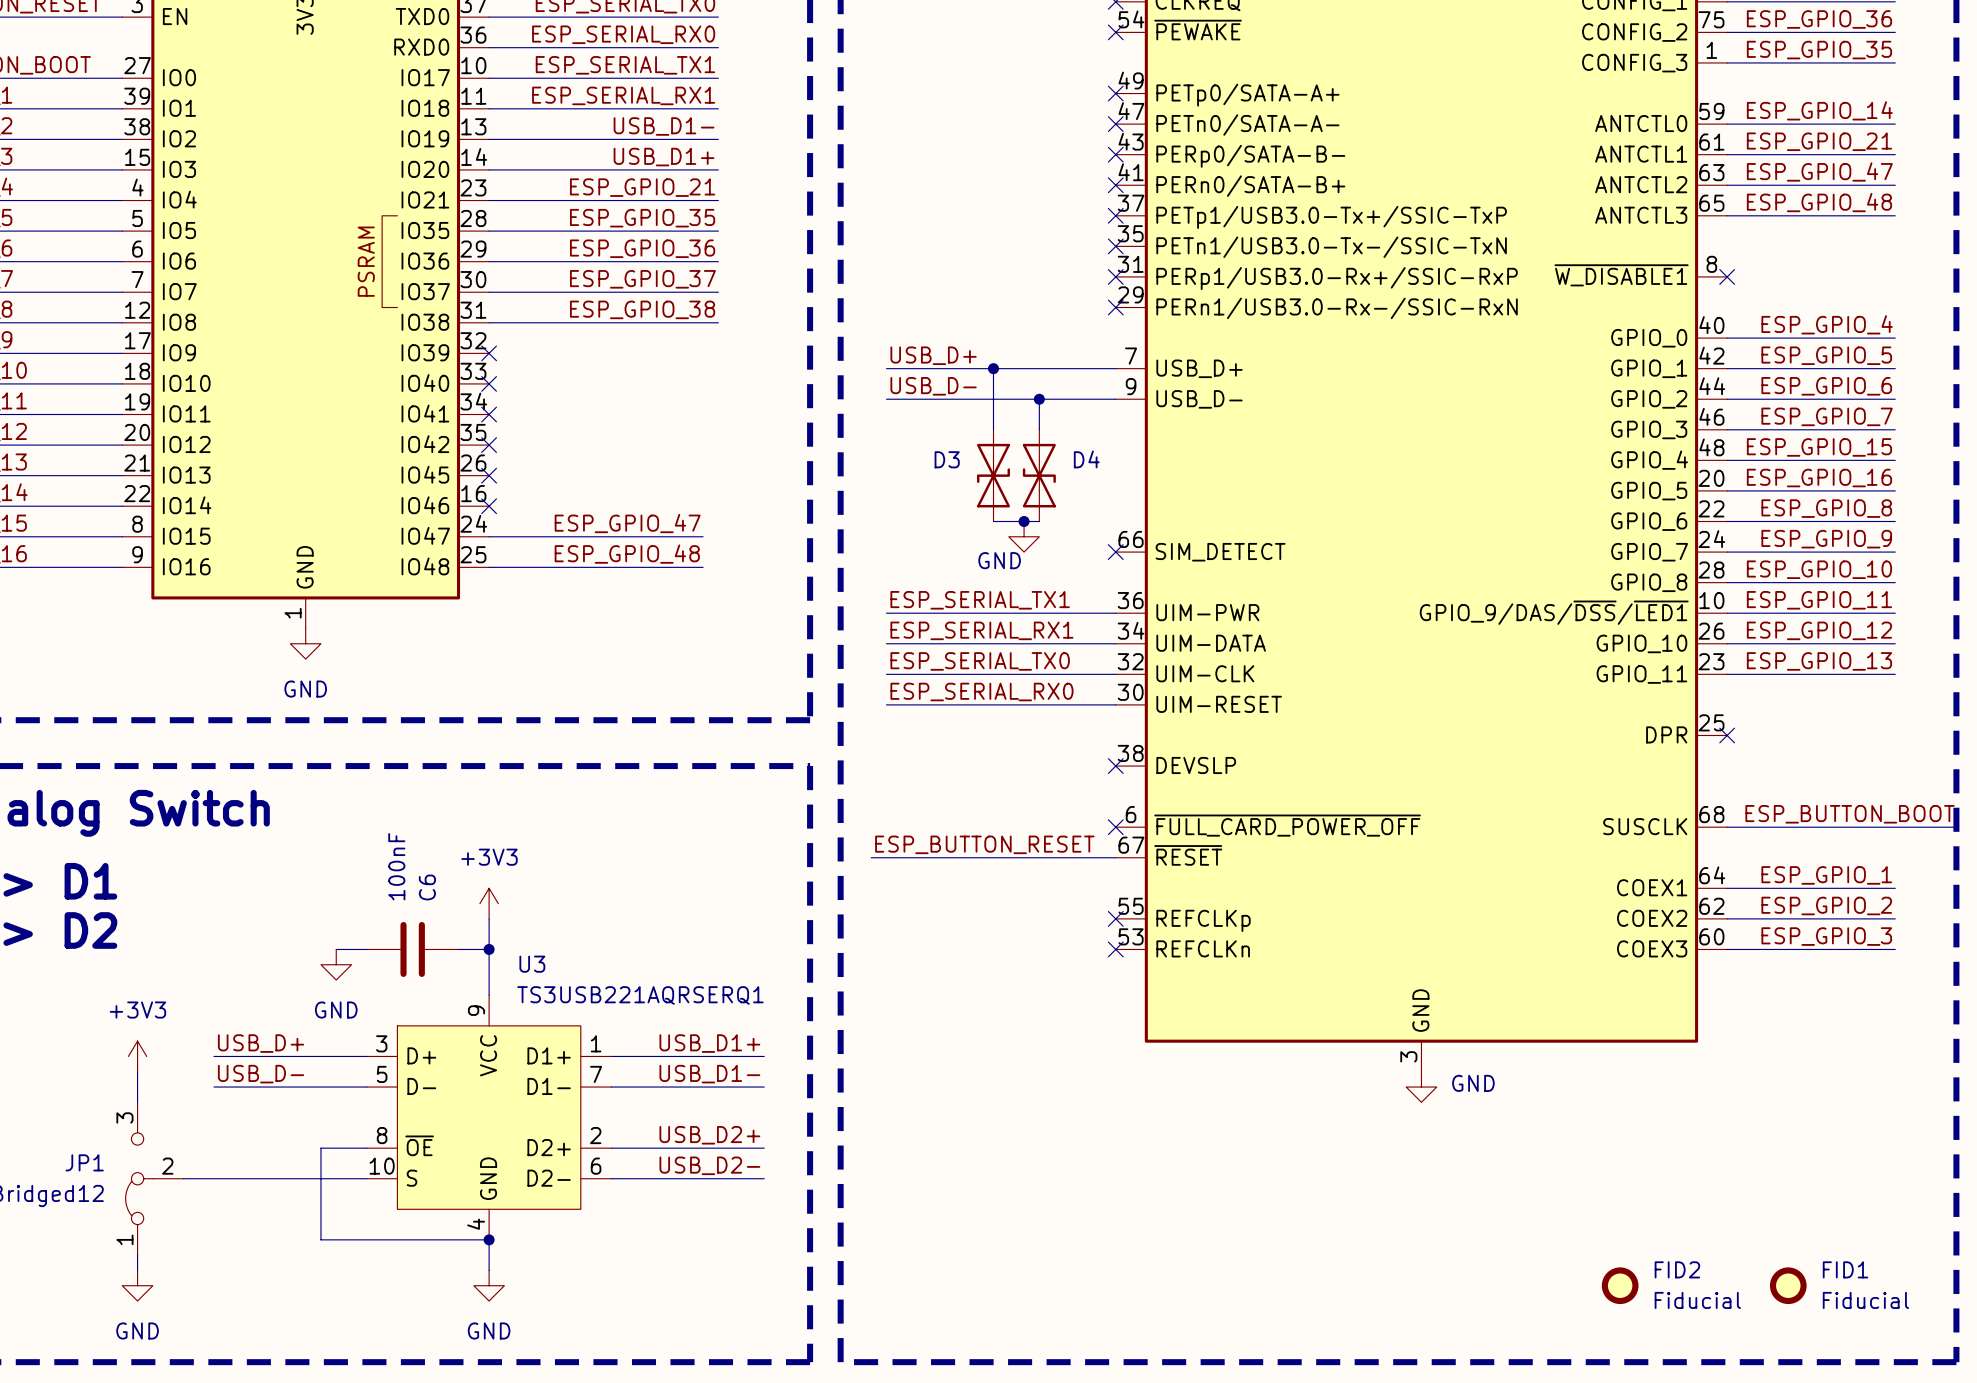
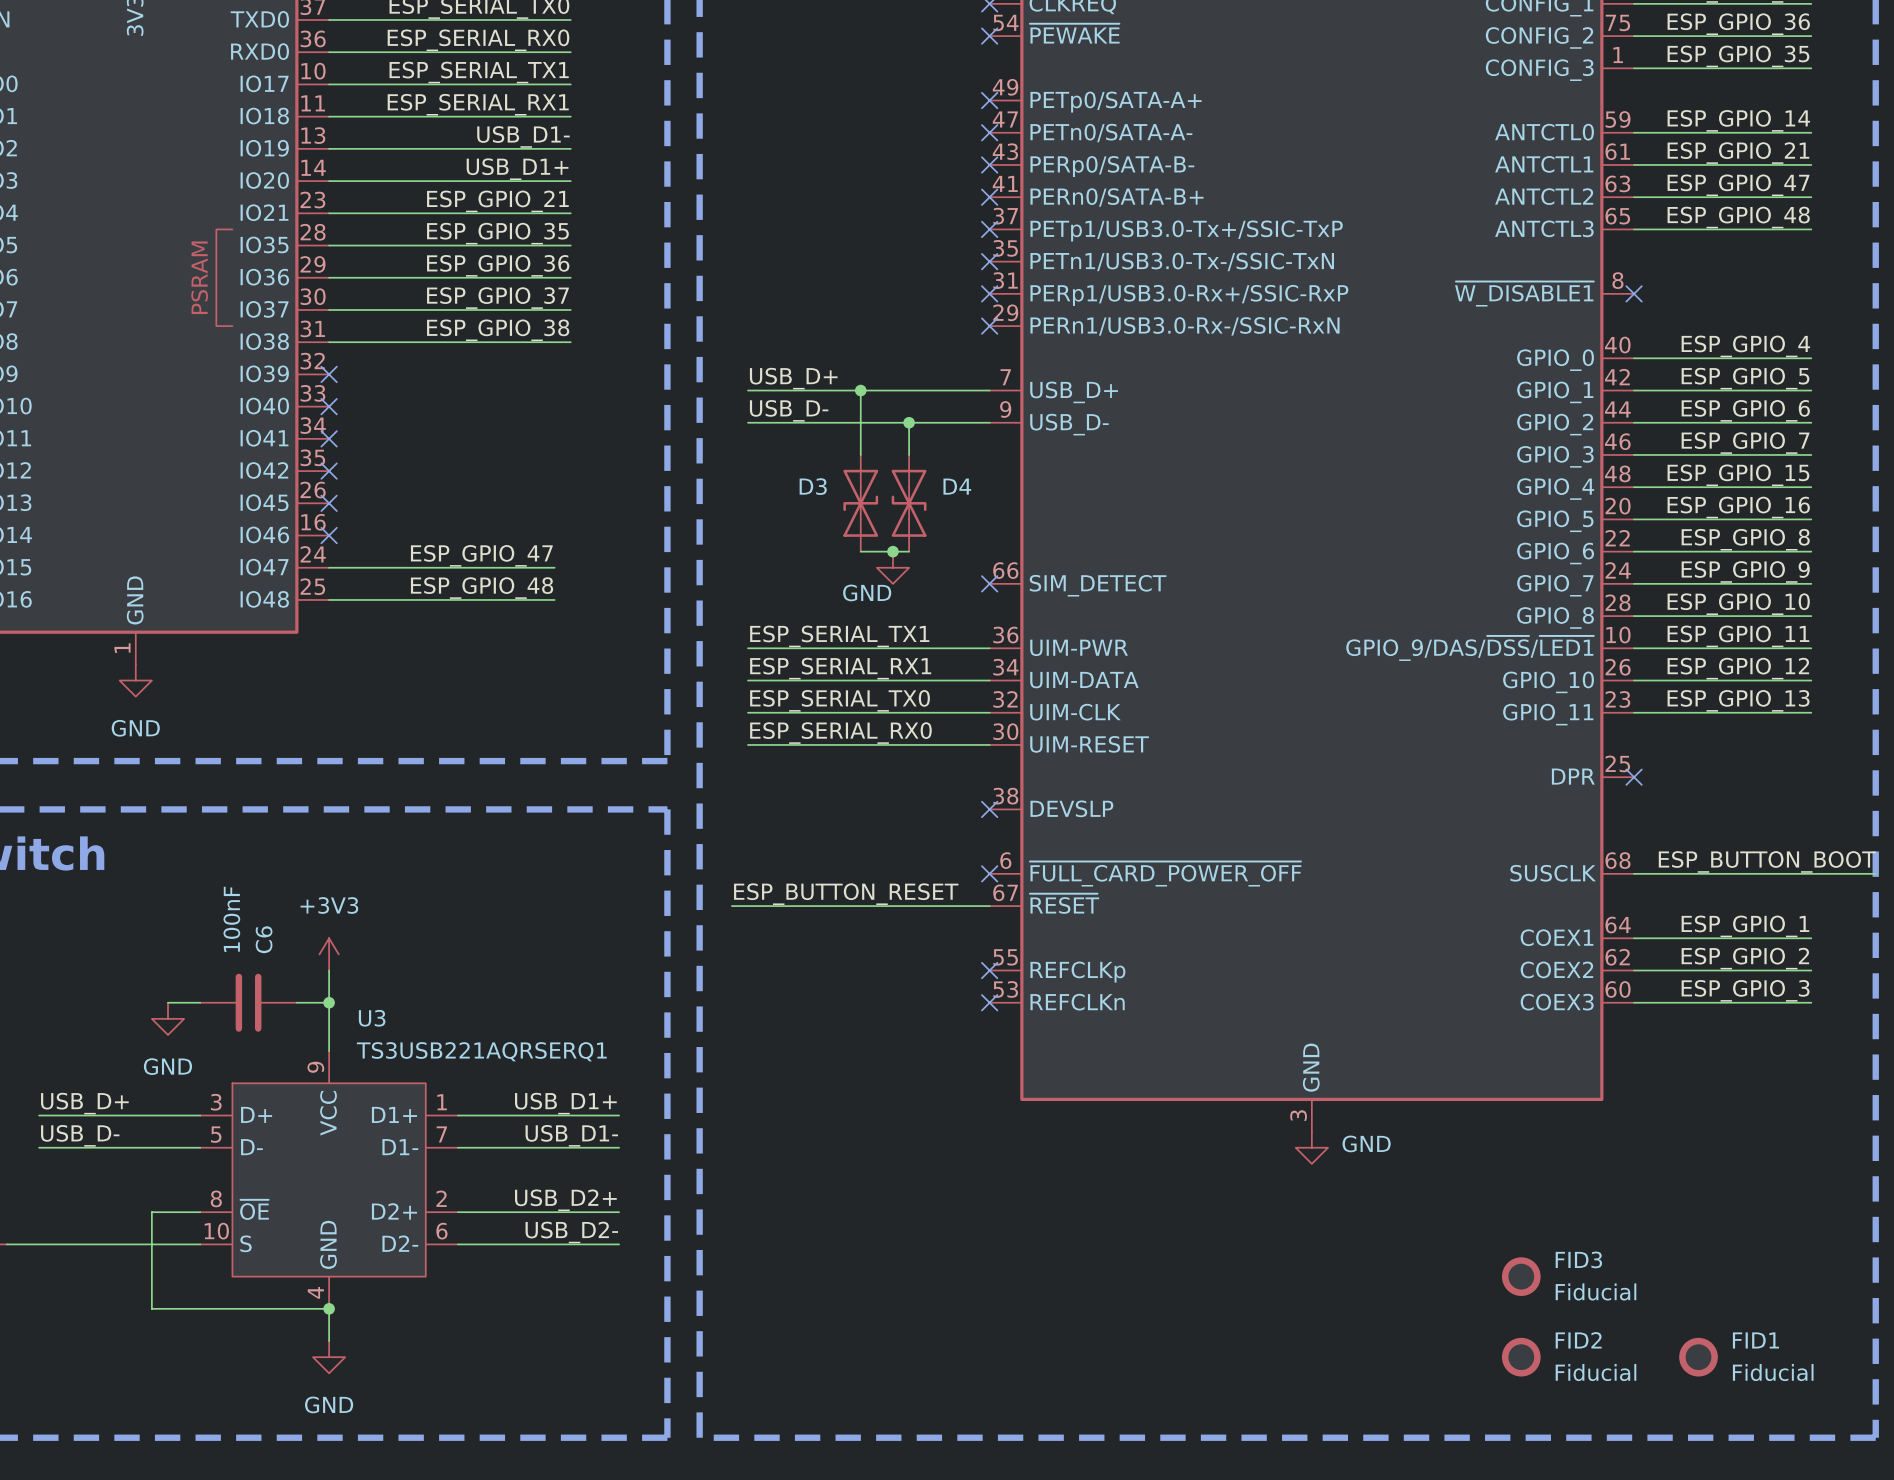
FID3: none -> Fiducial (1521, 1276)

